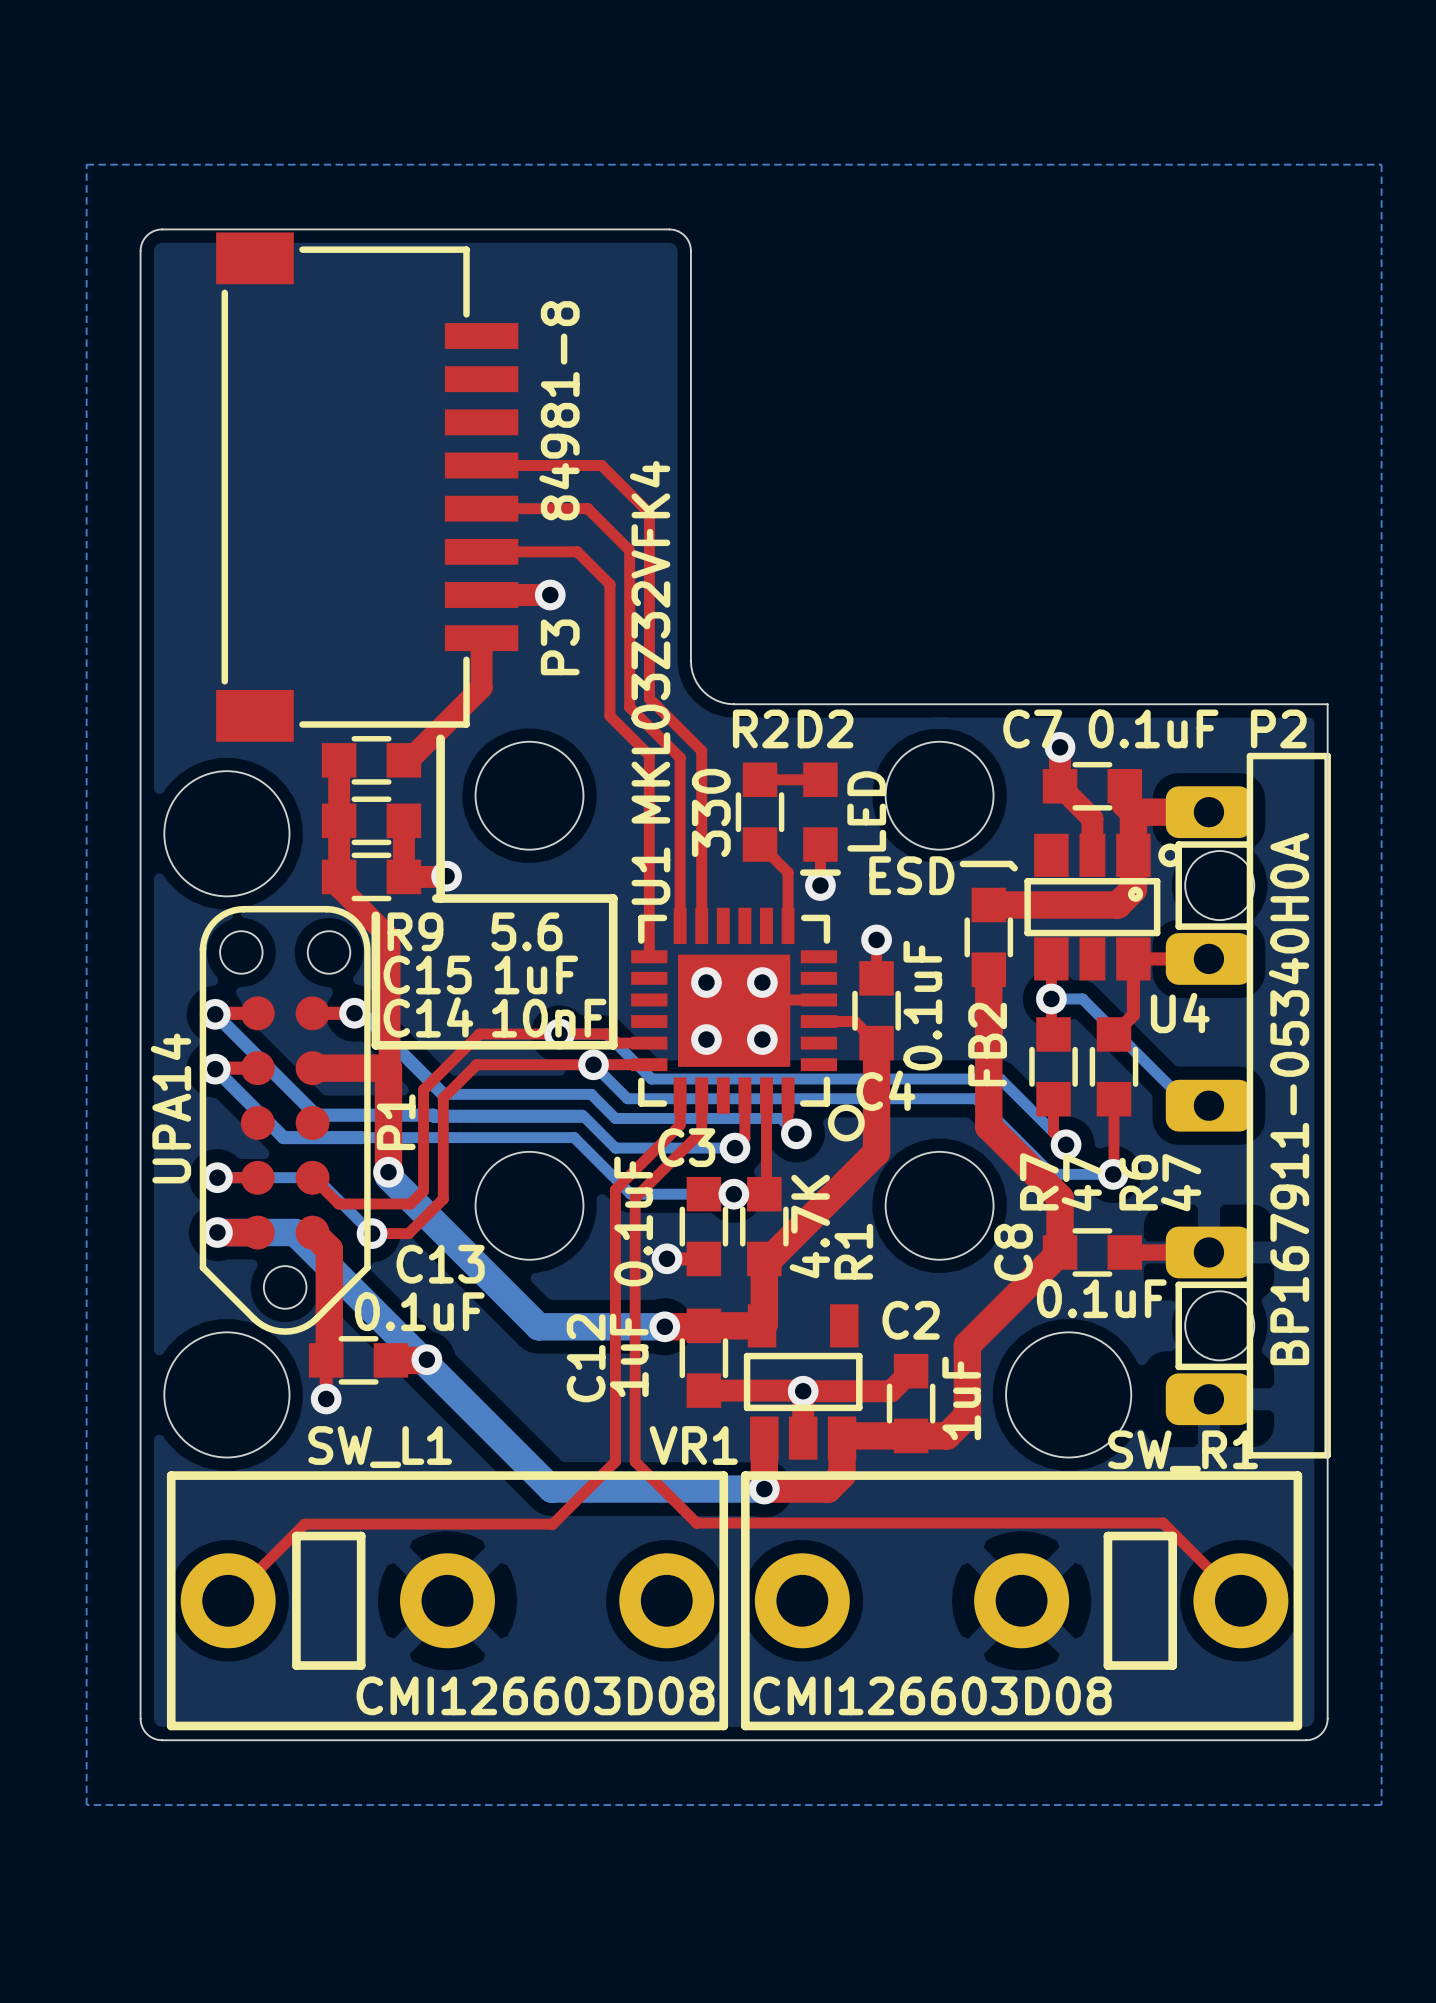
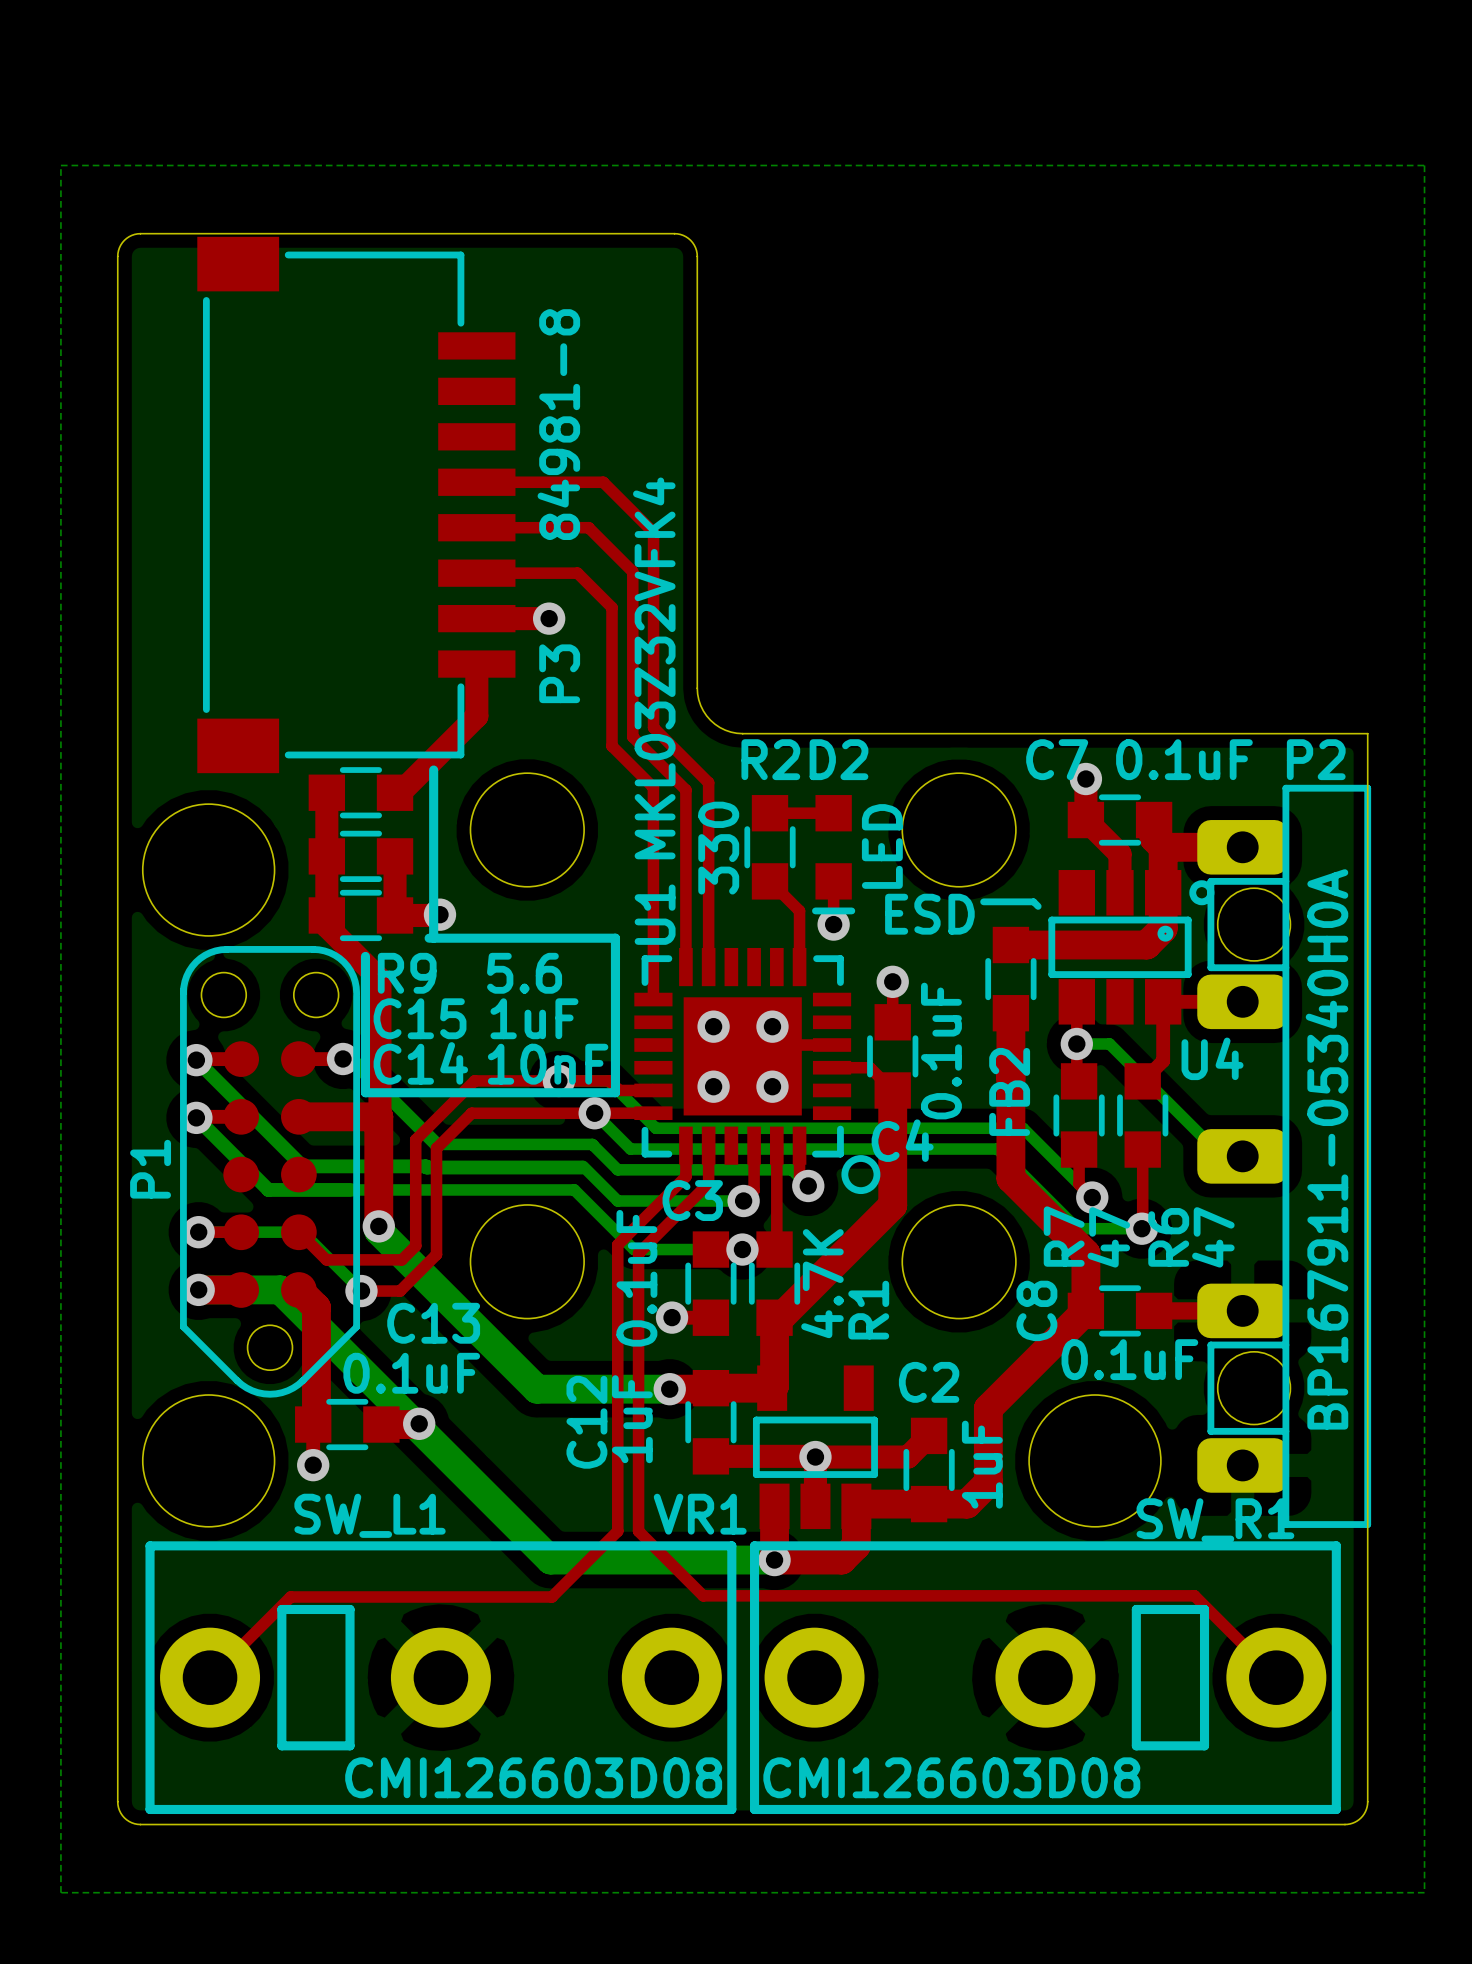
text: UPA14 (170, 1108) -> none
P1 name position: P1 (396, 1122) -> P1 (150, 1169)

